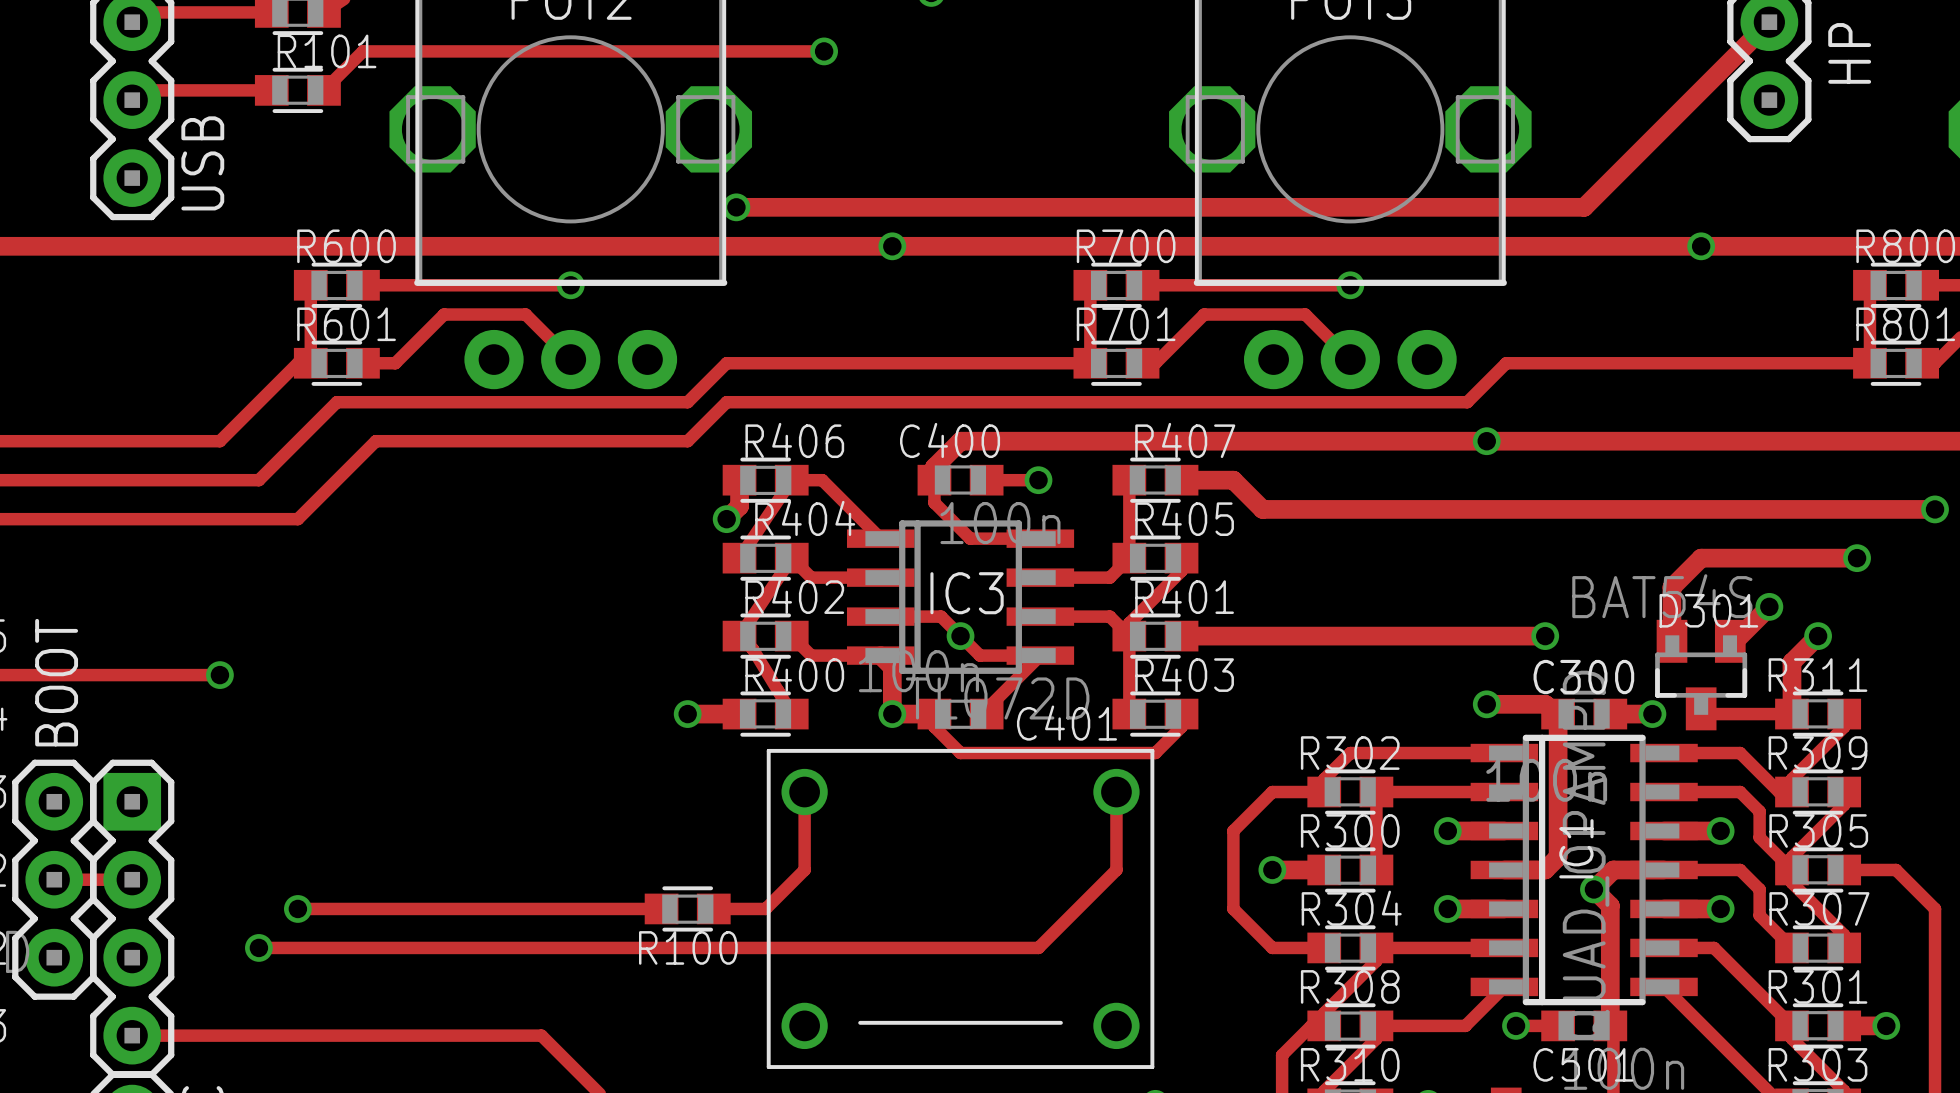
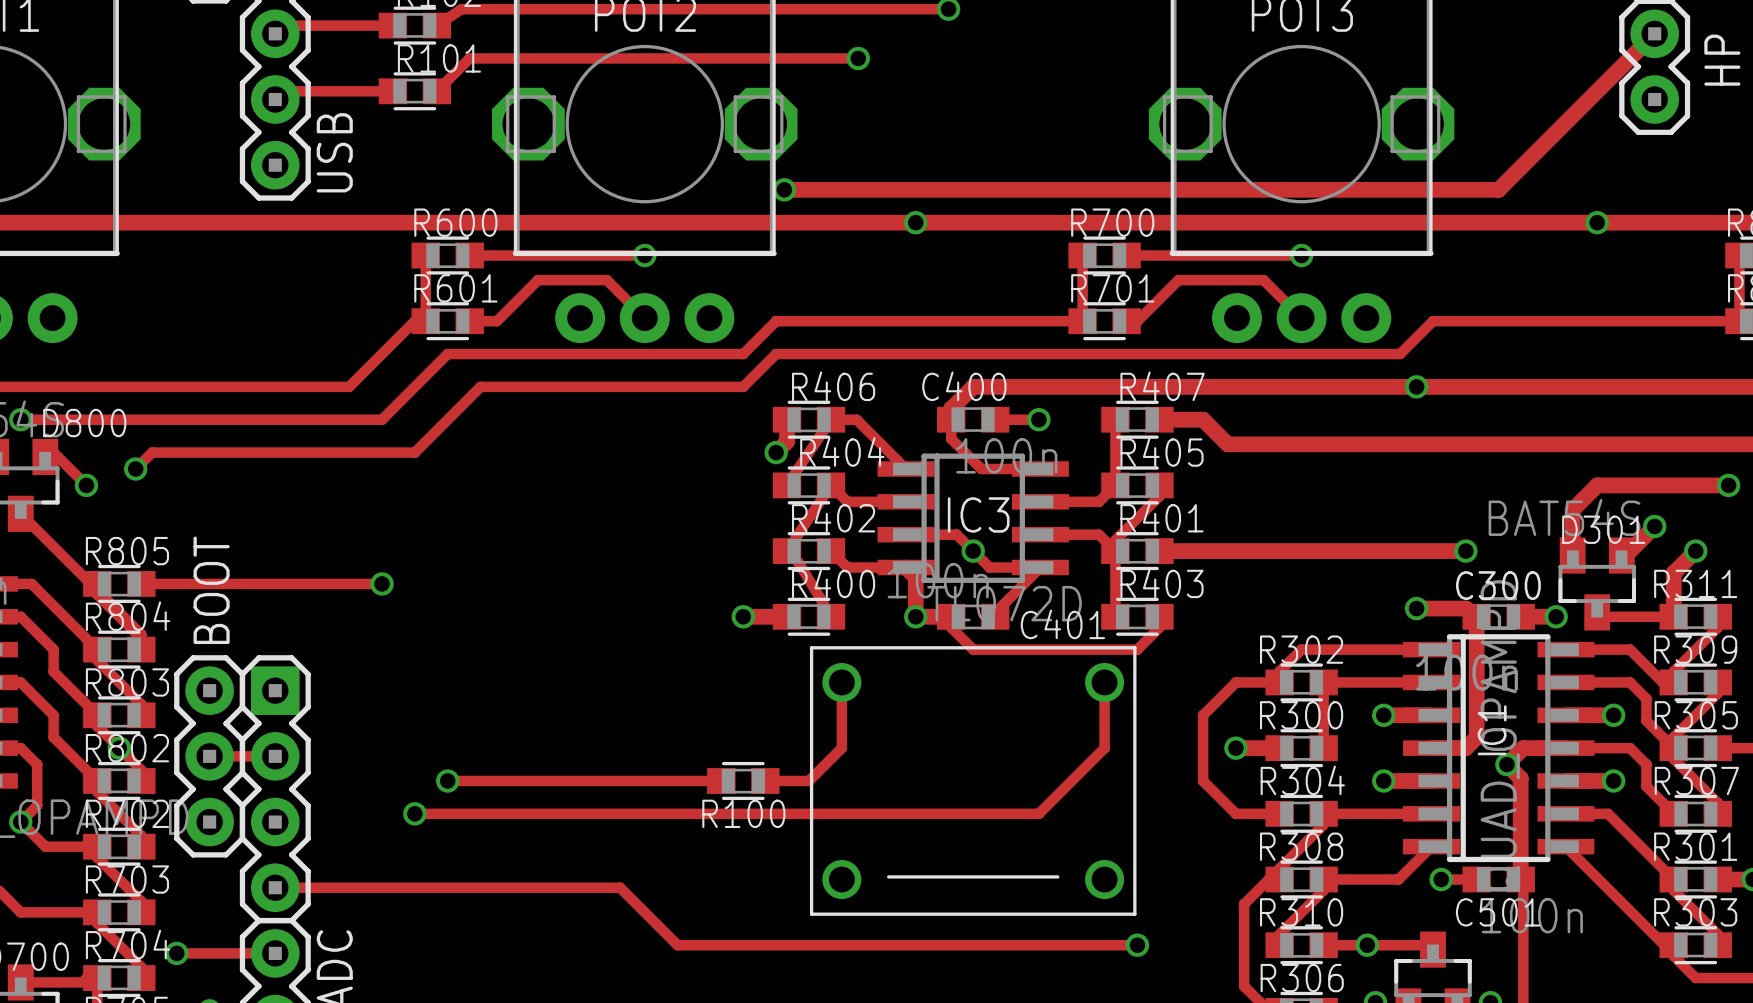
via position: (219, 675) -> (382, 583)
track: (297, 908) (336, 908) -> (349, 583) (382, 583)
via: (297, 908) -> none
via: none -> (447, 780)
track: (258, 947) (297, 947) -> none
via: (258, 947) -> none
via: none -> (414, 813)

